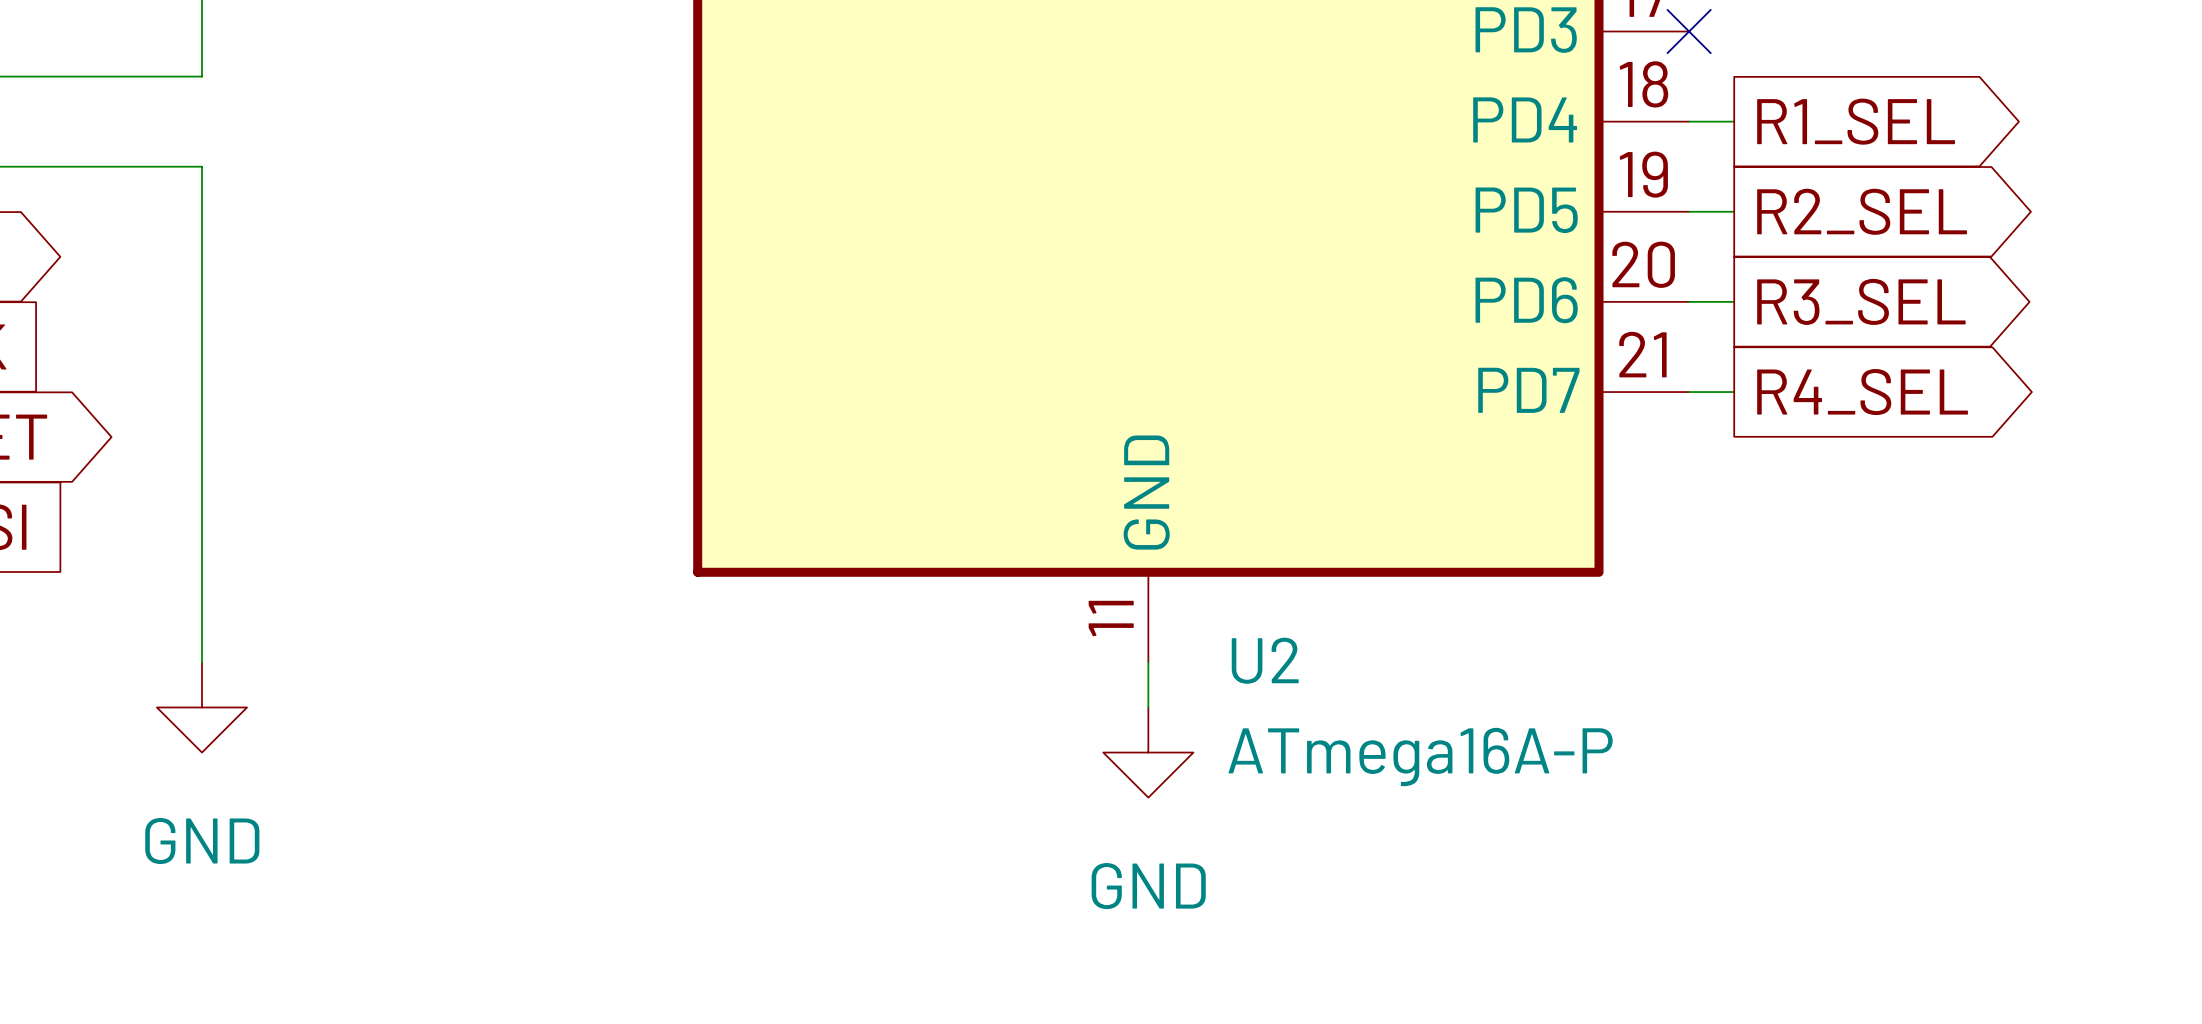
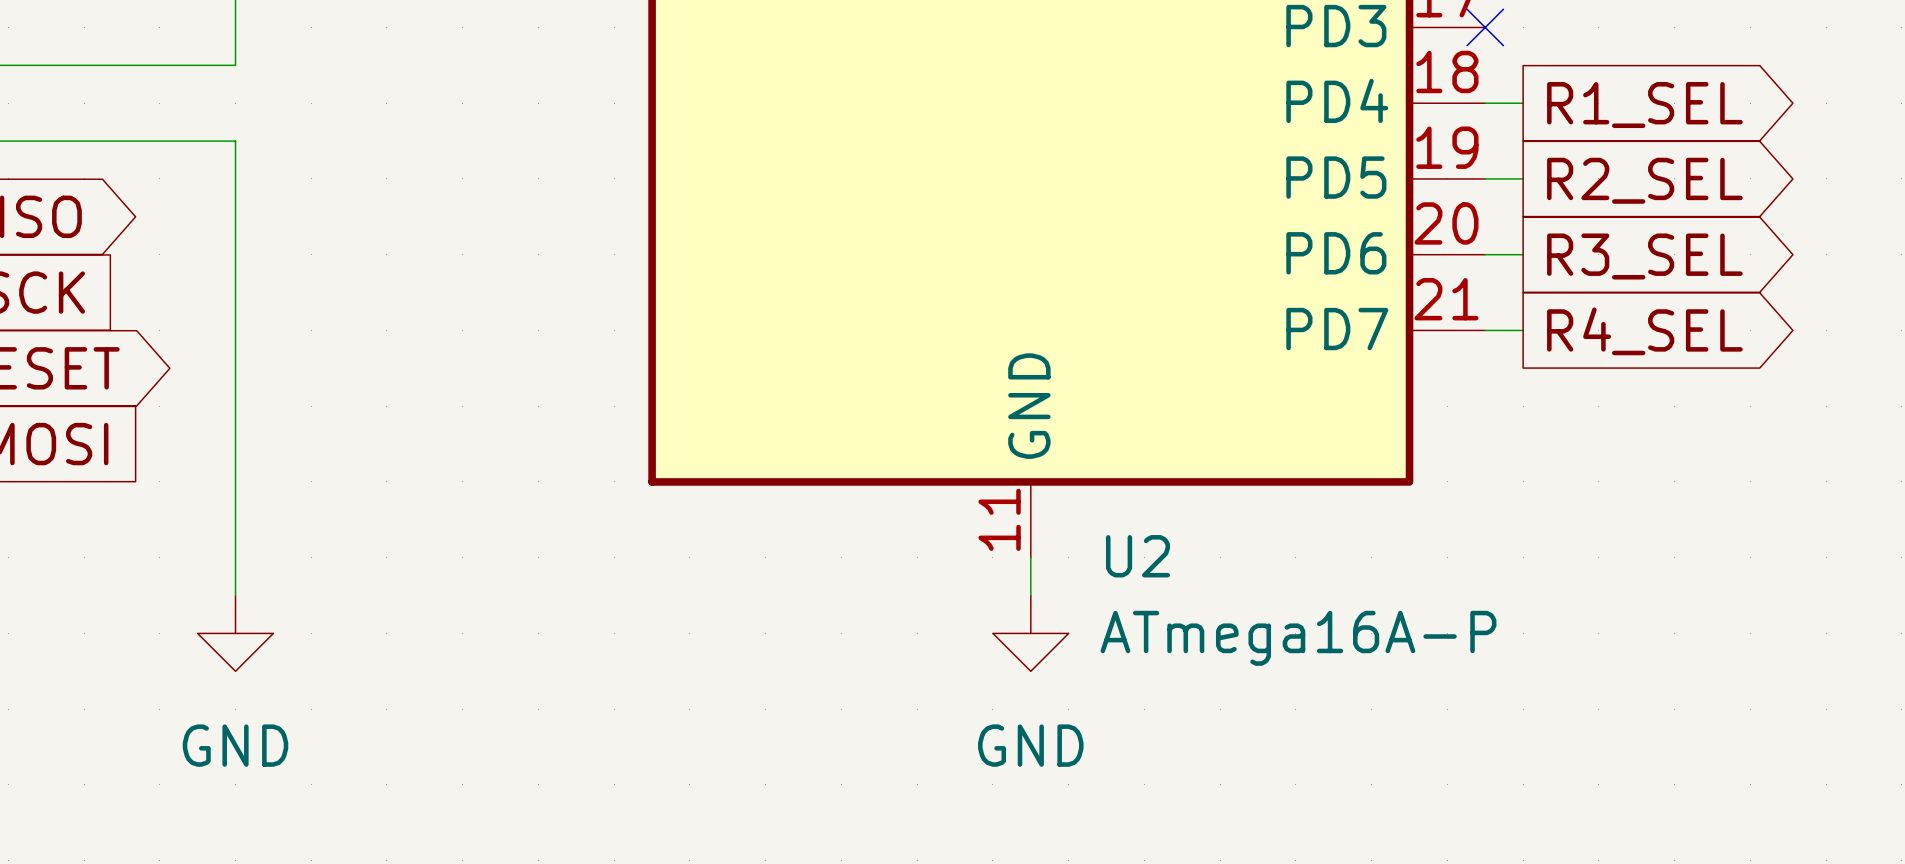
power symbol position: GND (202, 707) -> GND (235, 633)

